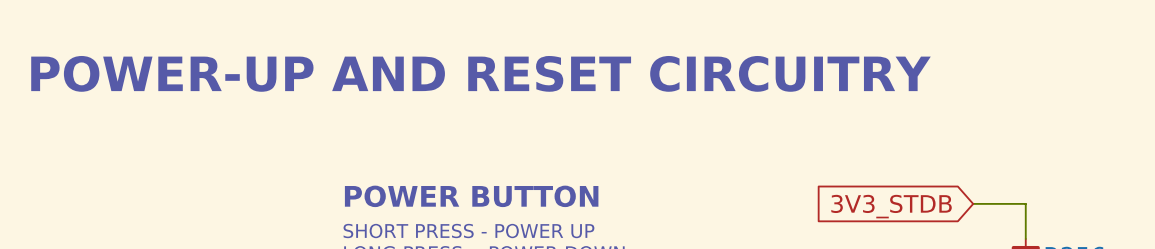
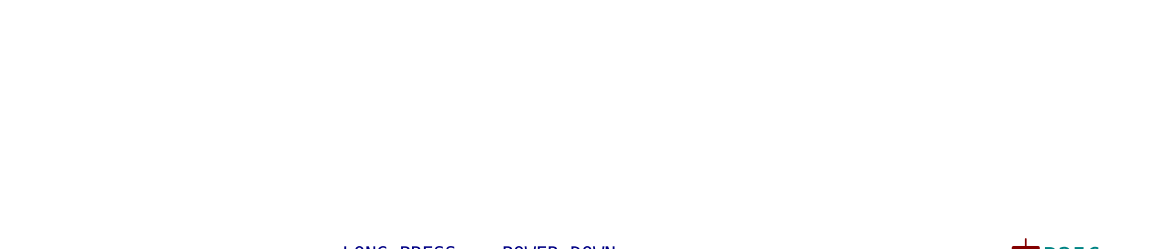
text: POWER-UP AND RESET CIRCUITRY (480, 73) -> none
text: POWER BUTTON (471, 196) -> none
wire: (973, 203) (1025, 203) (1025, 238) -> none
global label: 3V3_STDB (891, 206) -> none
text: SHORT PRESS - POWER UP (468, 231) -> none

